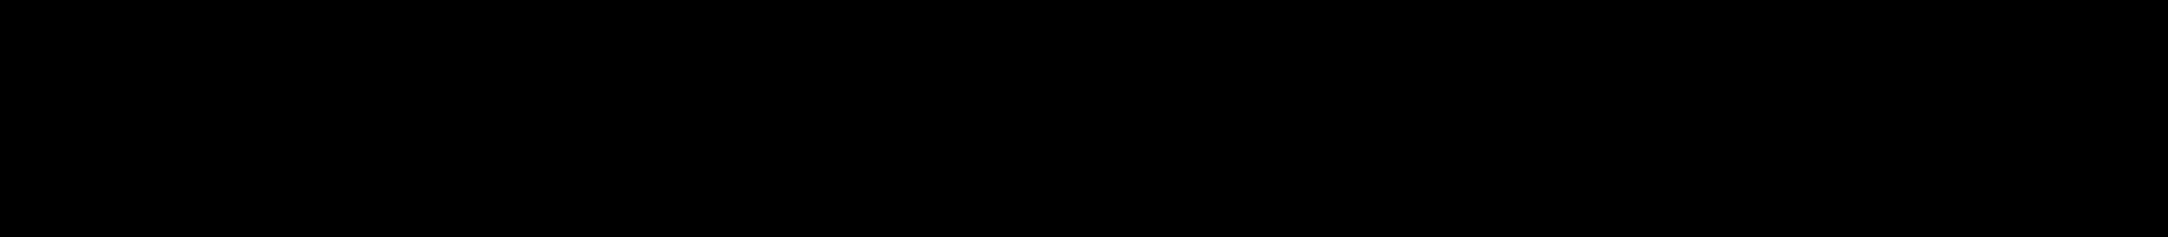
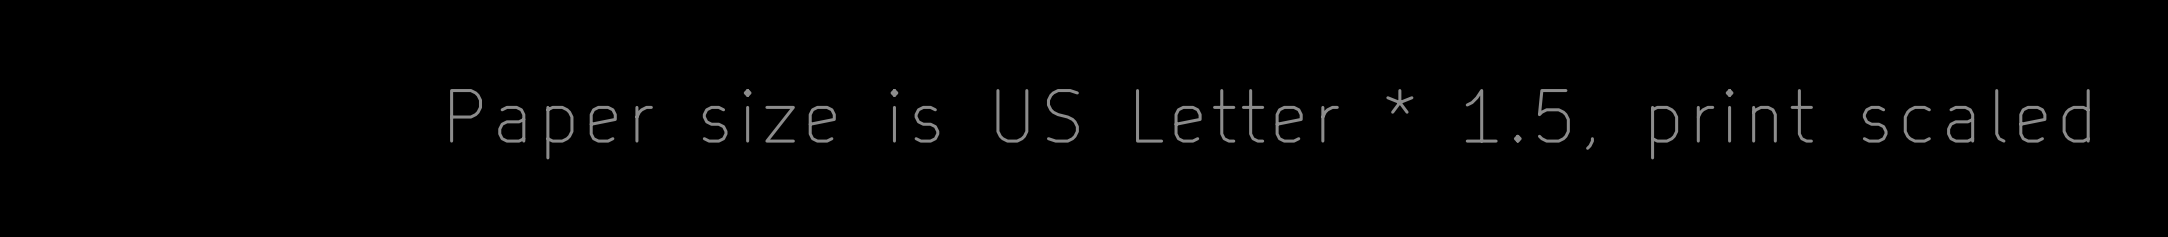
text: none -> Paper size is US Letter * 1.5, print scaled (1269, 124)

